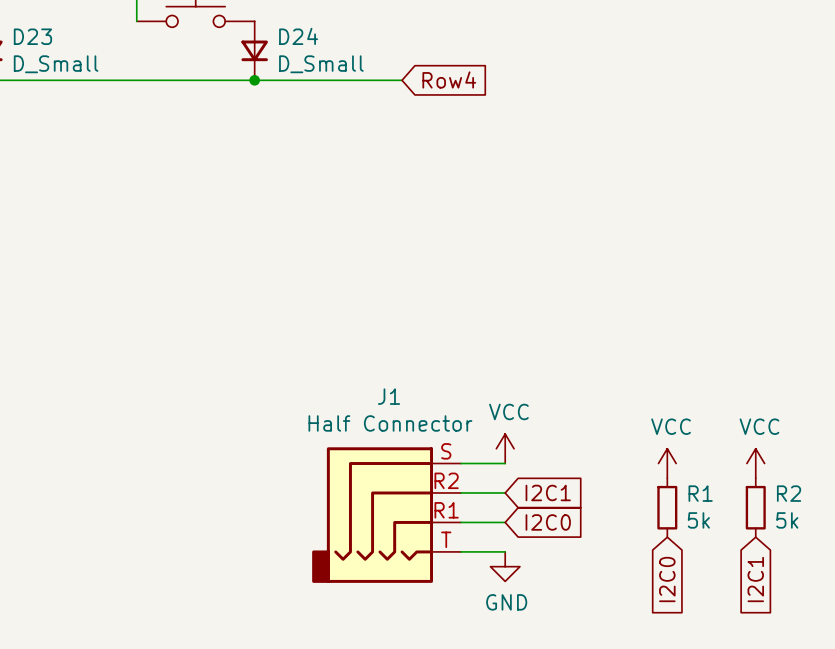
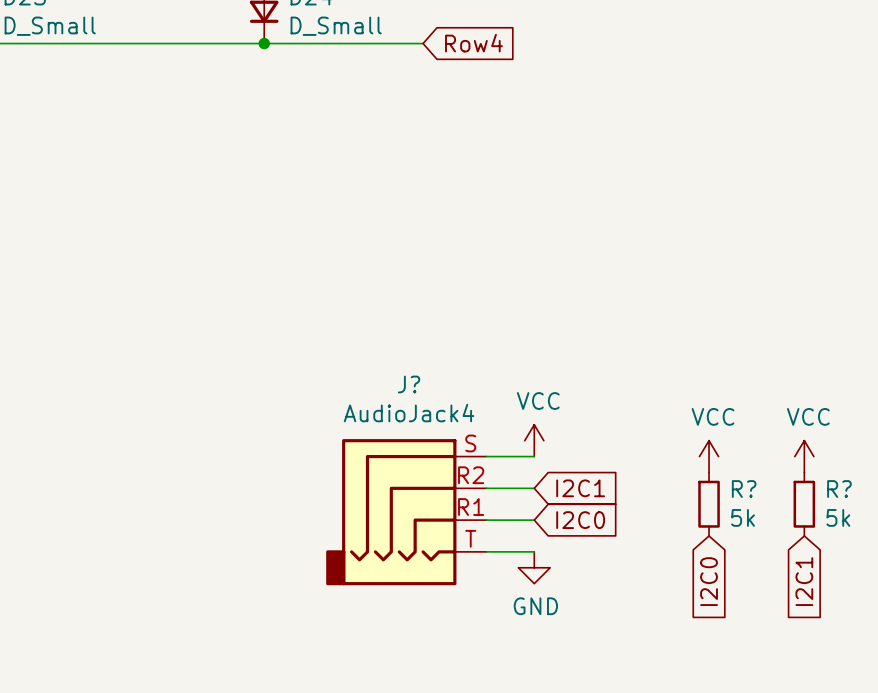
J1 name: J1 (389, 396) -> J? (409, 384)
J1 value: Half Connector (390, 423) -> AudioJack4 (409, 413)
R1 name: R1 (700, 493) -> R? (744, 489)
R2 name: R2 (789, 493) -> R? (839, 489)

